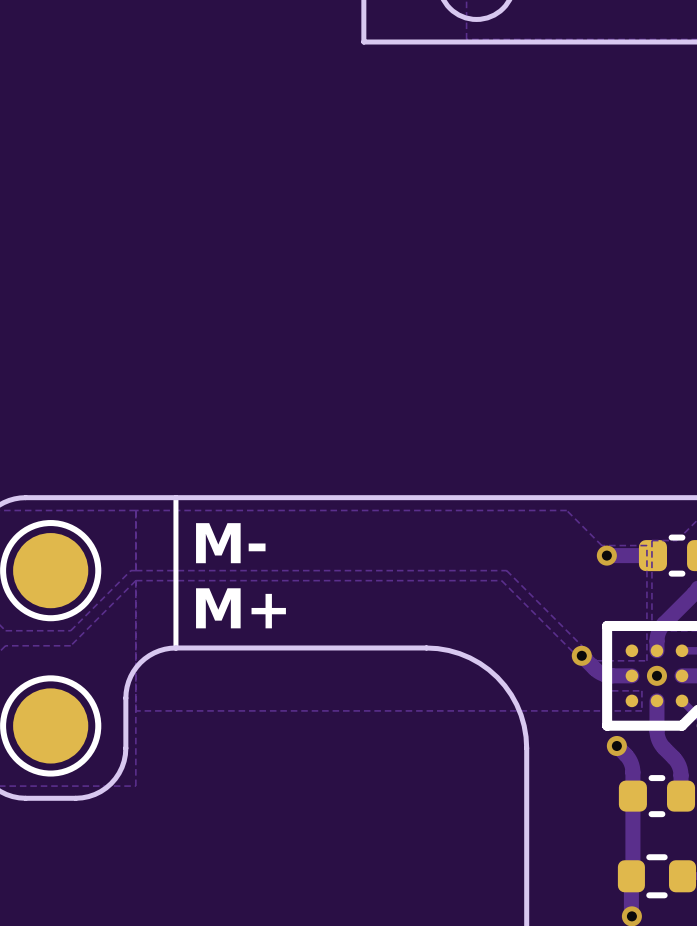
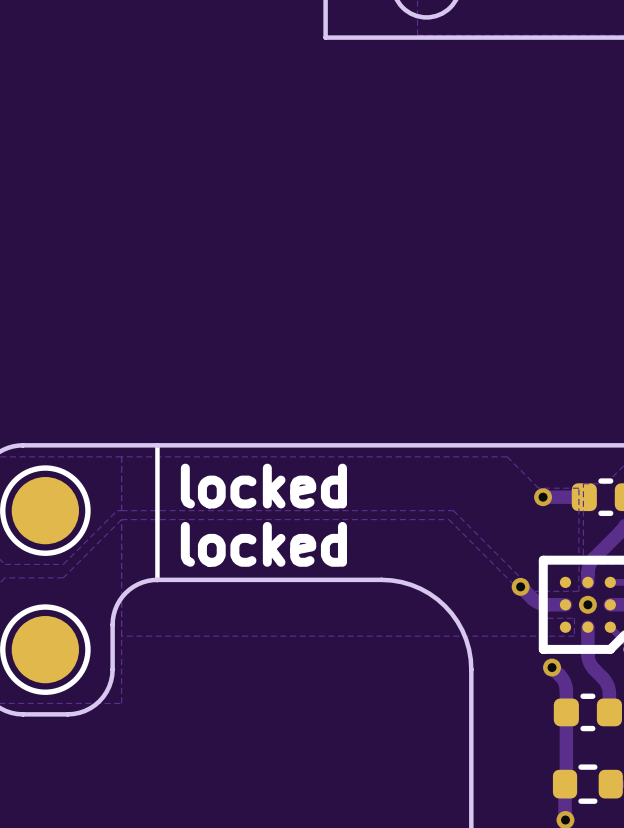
text: M- (230, 543) -> locked (263, 486)
text: M+ (240, 608) -> locked (263, 544)

